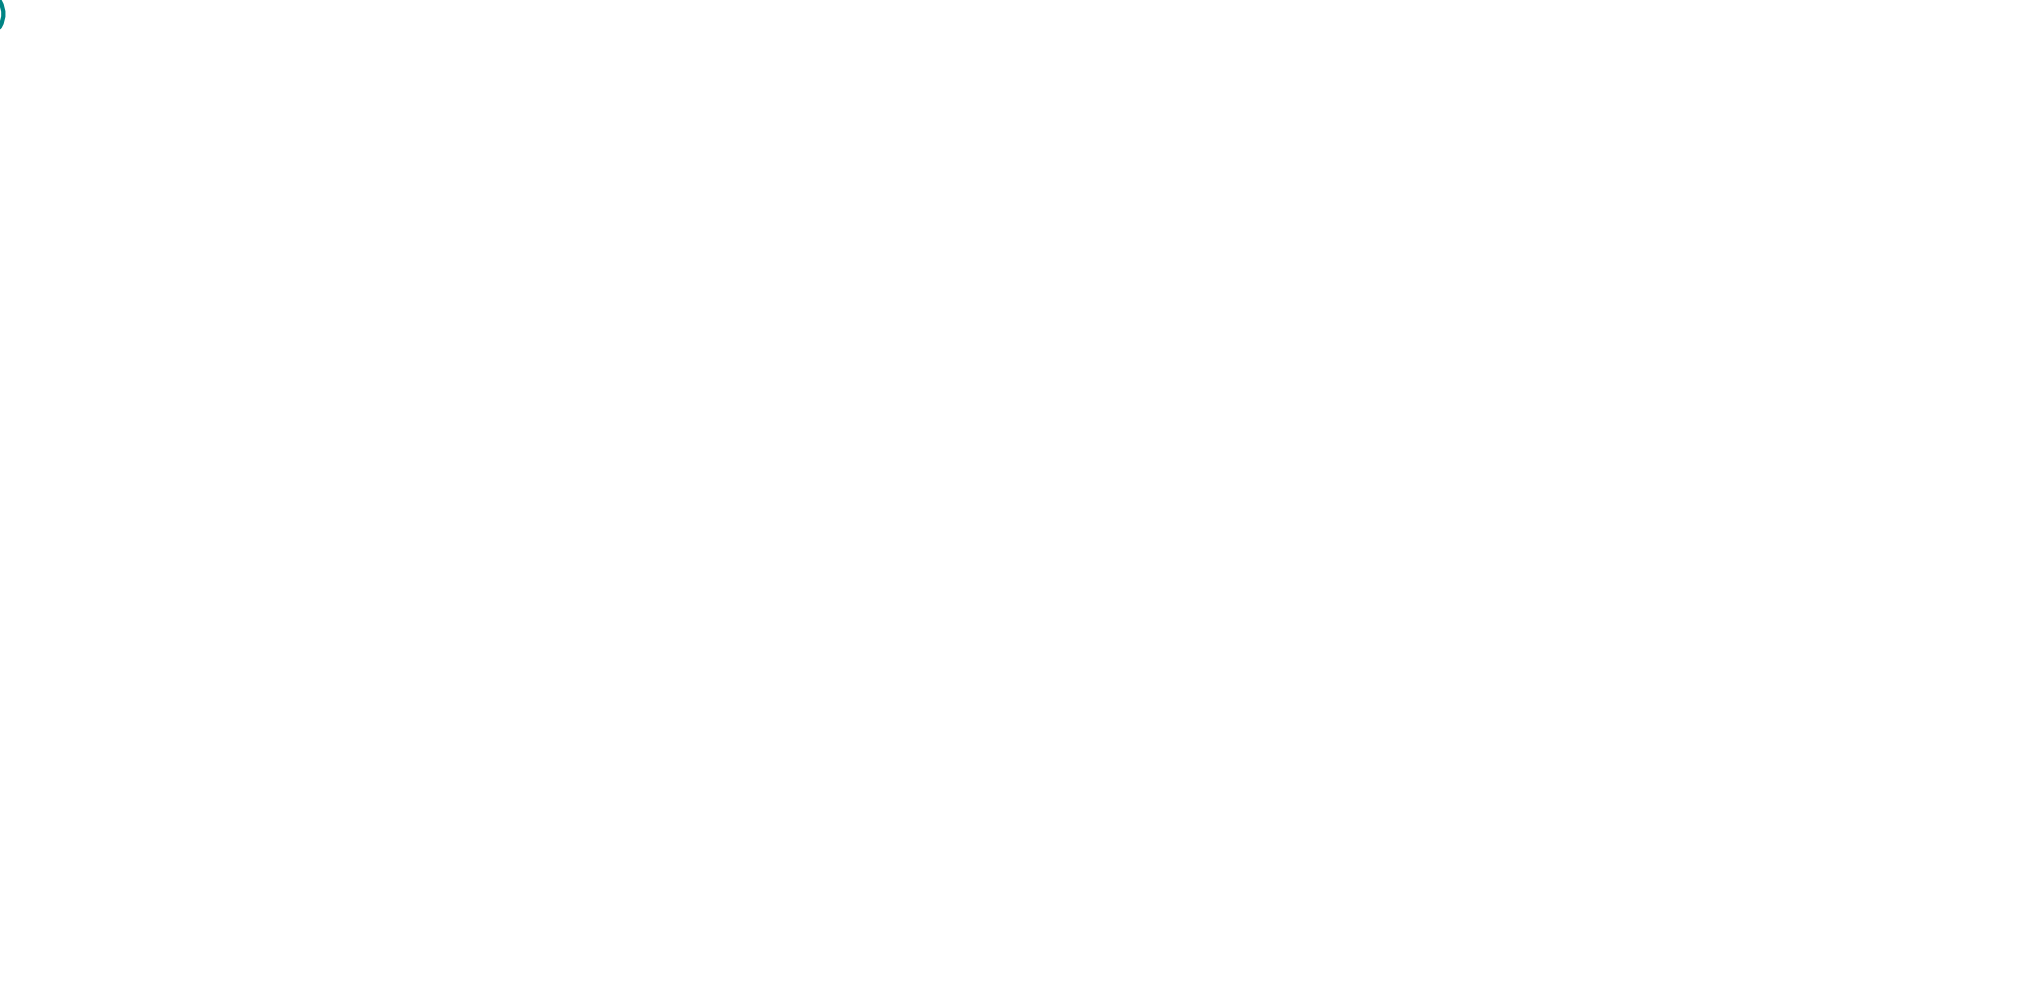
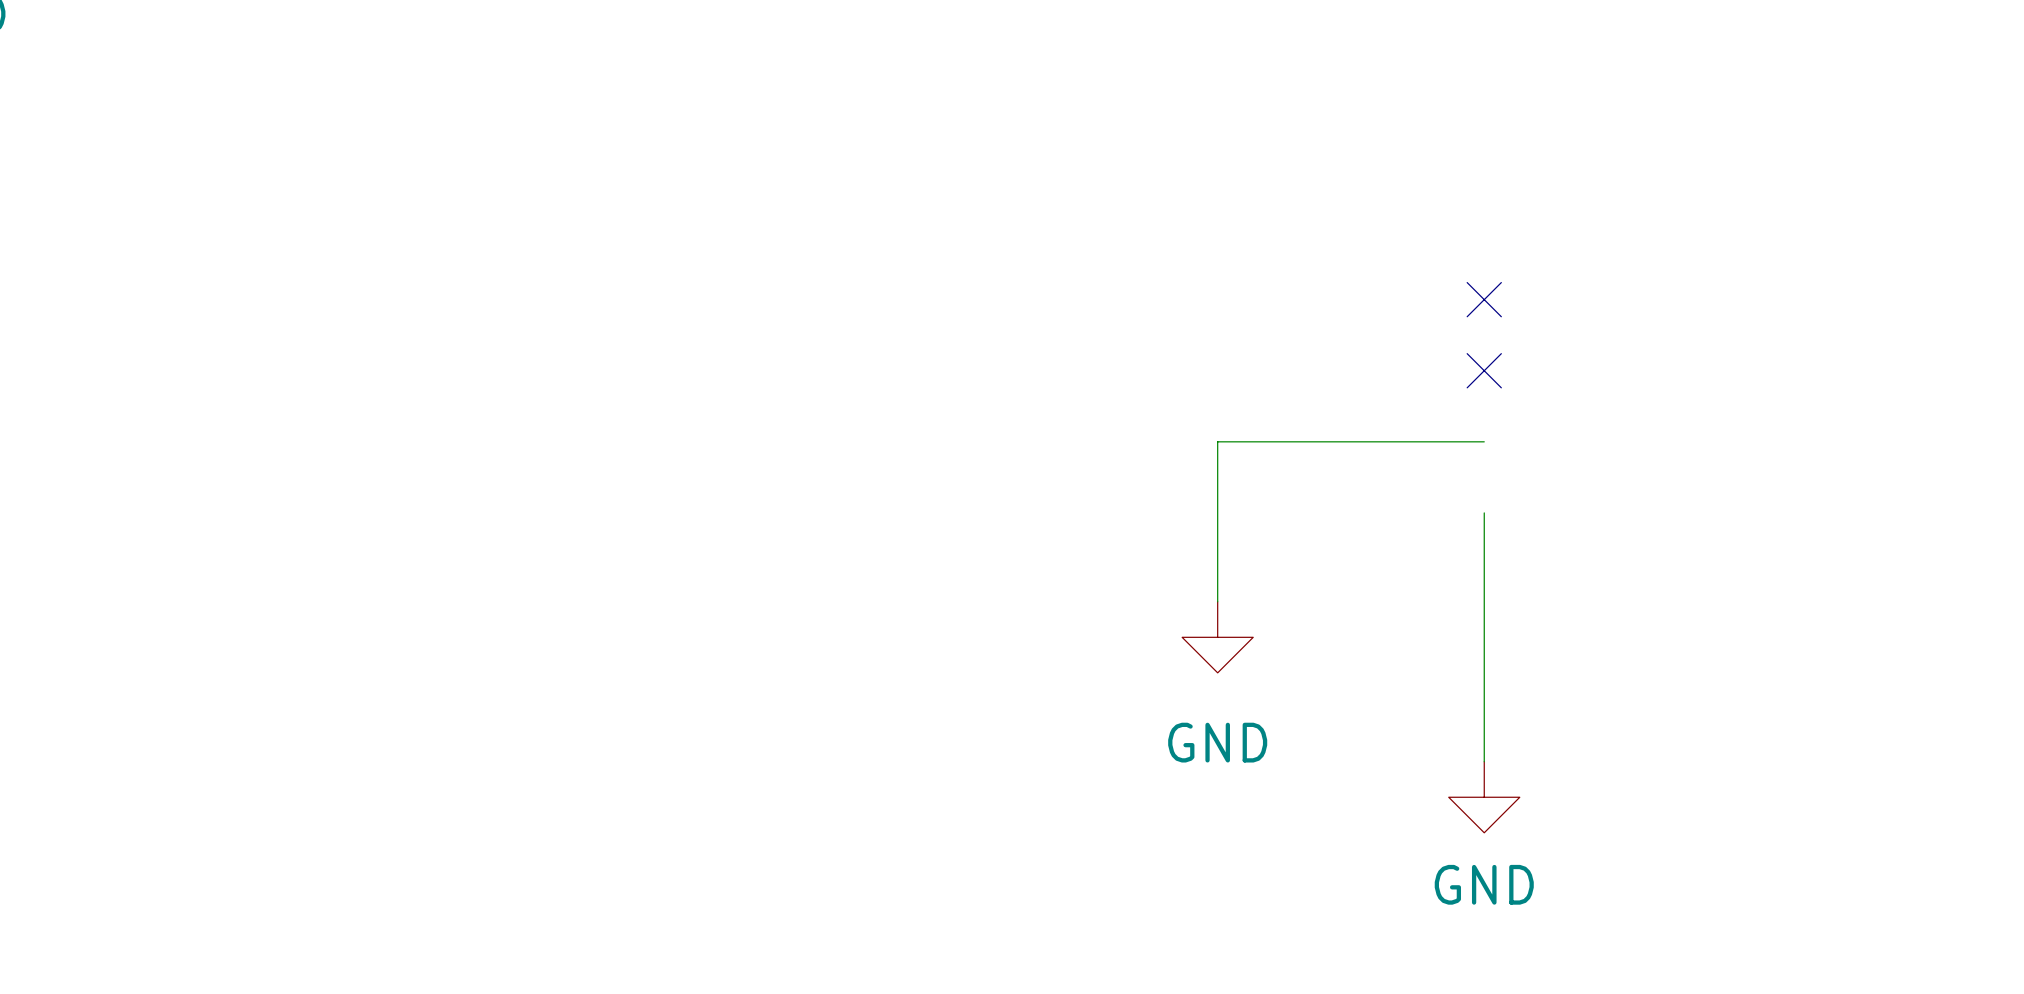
no-connect mark: none -> (1484, 299)
no-connect mark: none -> (1484, 370)
wire: none -> (1484, 441) (1217, 441) (1217, 601)
wire: none -> (1484, 512) (1484, 761)
power symbol: none -> GND (1217, 637)
power symbol: none -> GND (1484, 797)

